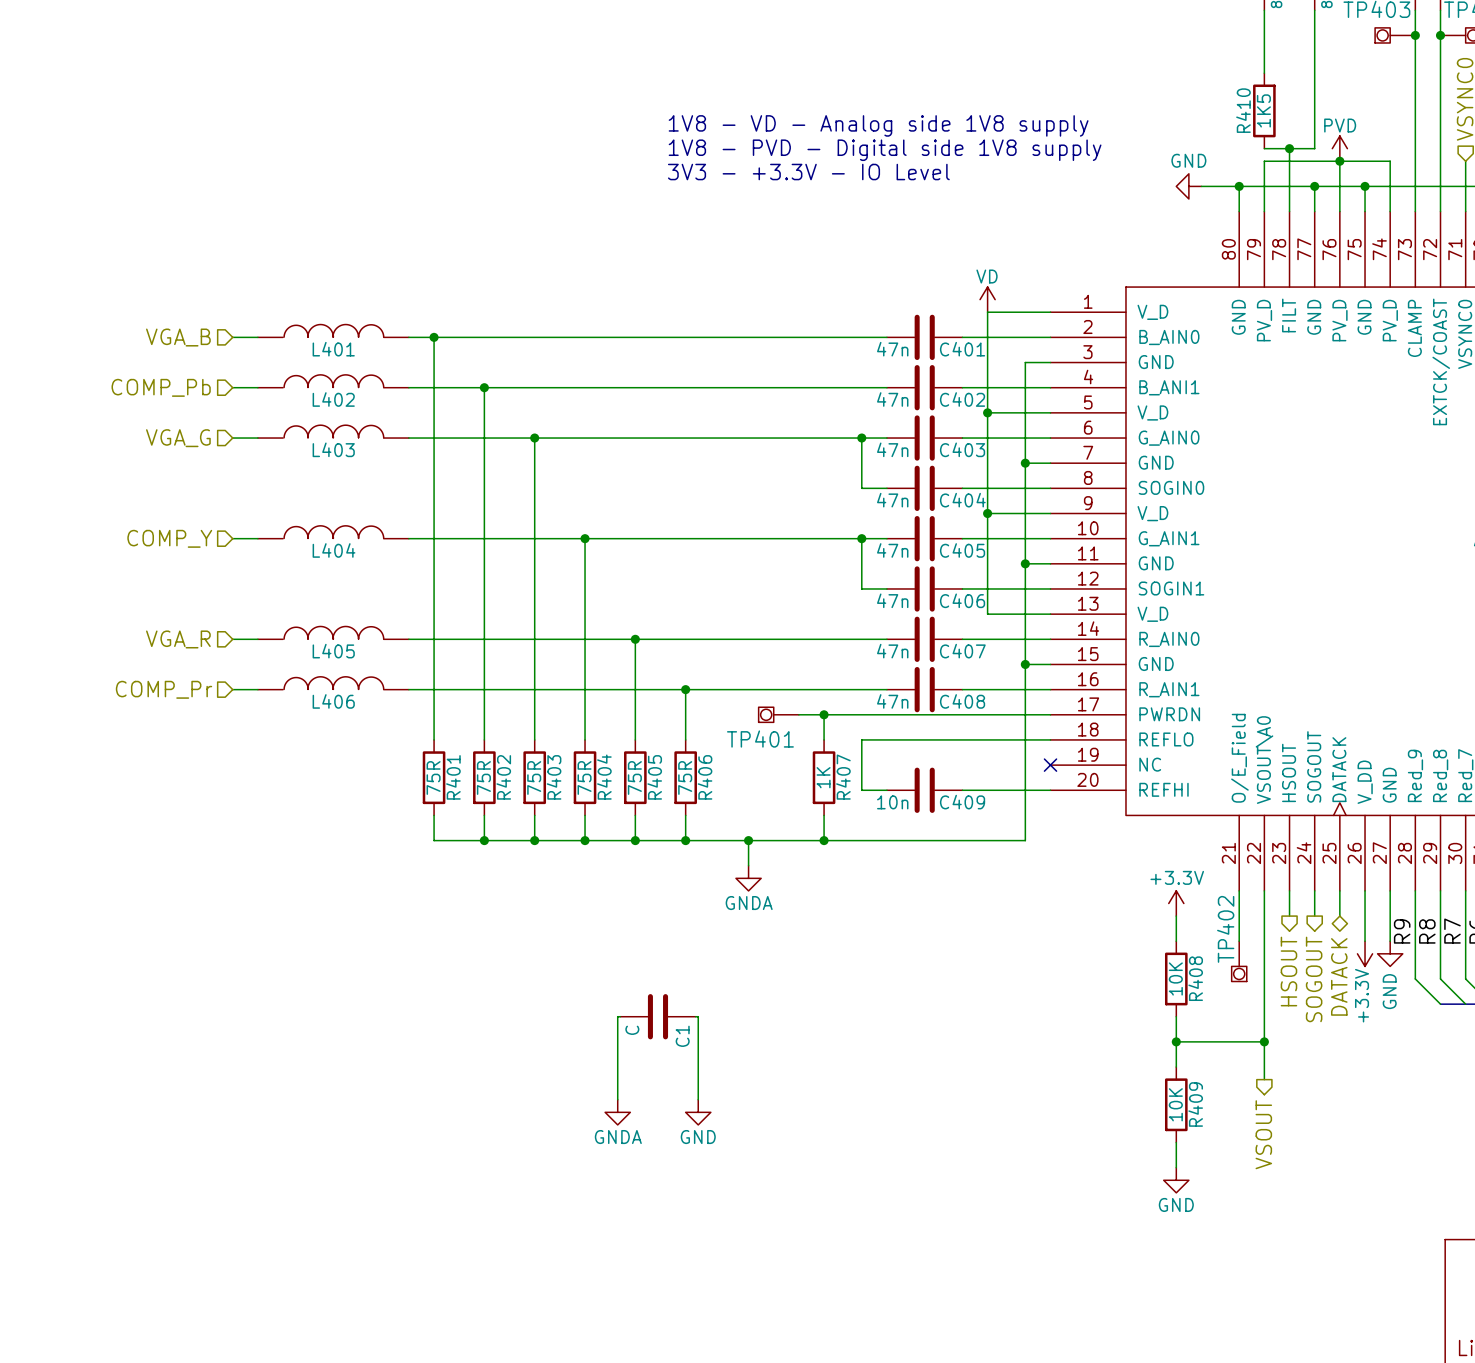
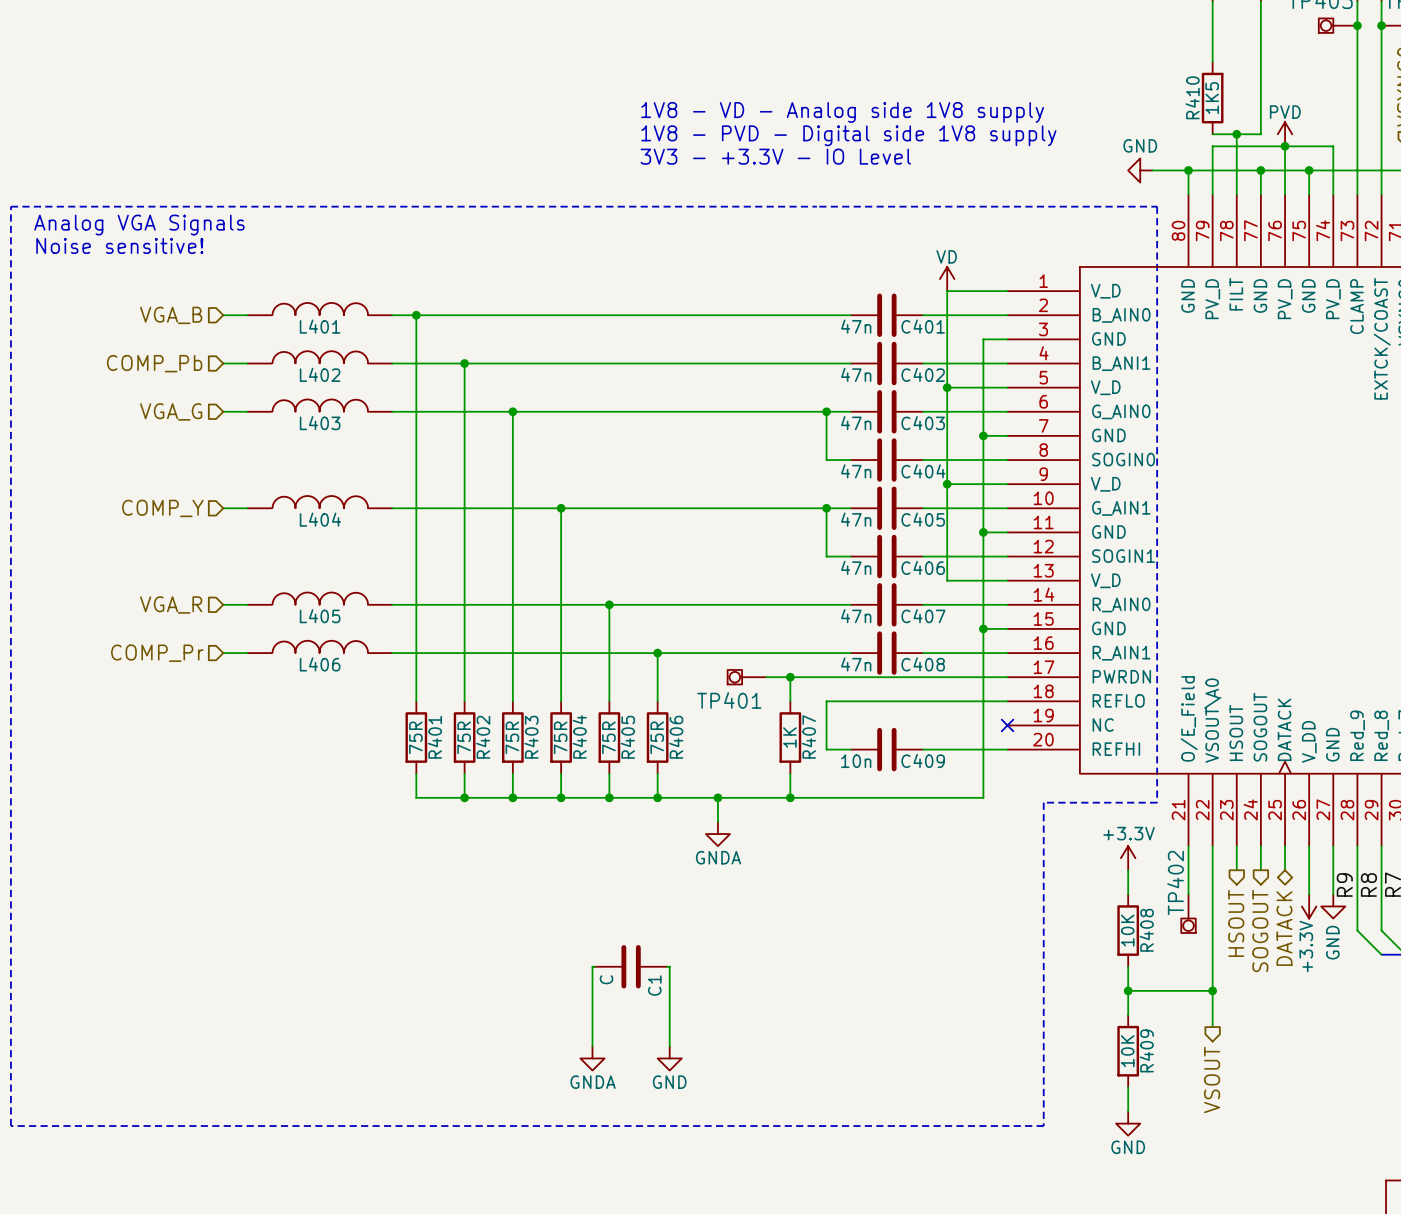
line: none -> (816, 206) (10, 206) (10, 1126) (1043, 1126) (1043, 802) (1157, 802) (1157, 206) (819, 206)
text: none -> Analog VGA Signals (139, 225)
text: none -> Noise sensitive! (119, 245)

